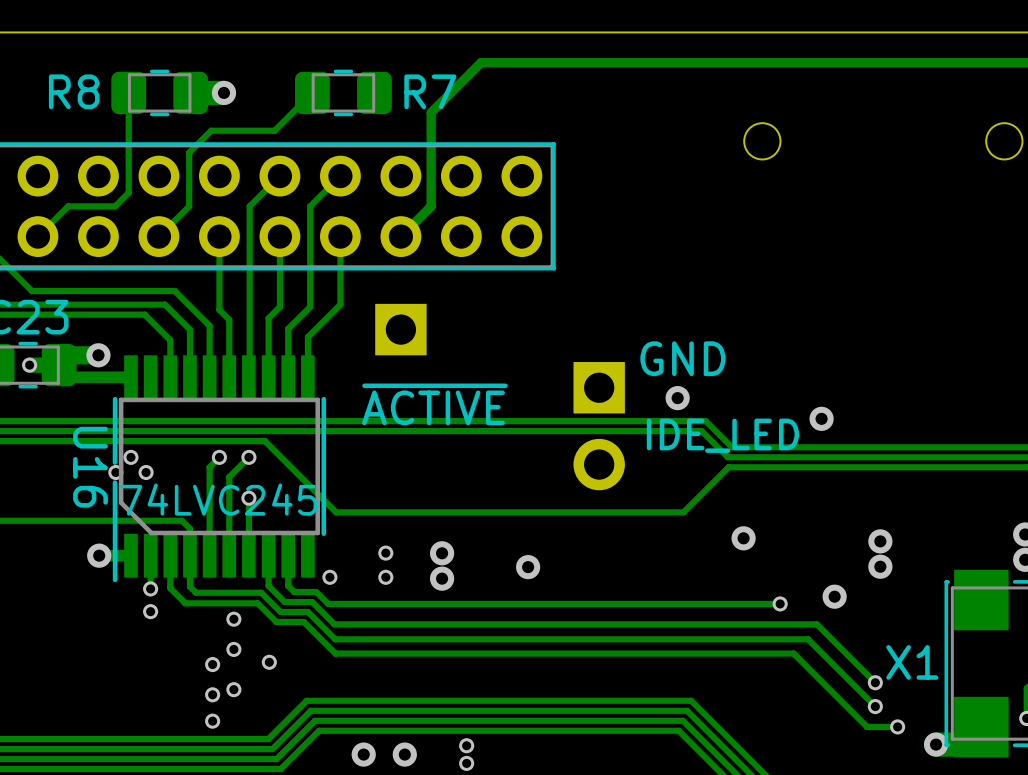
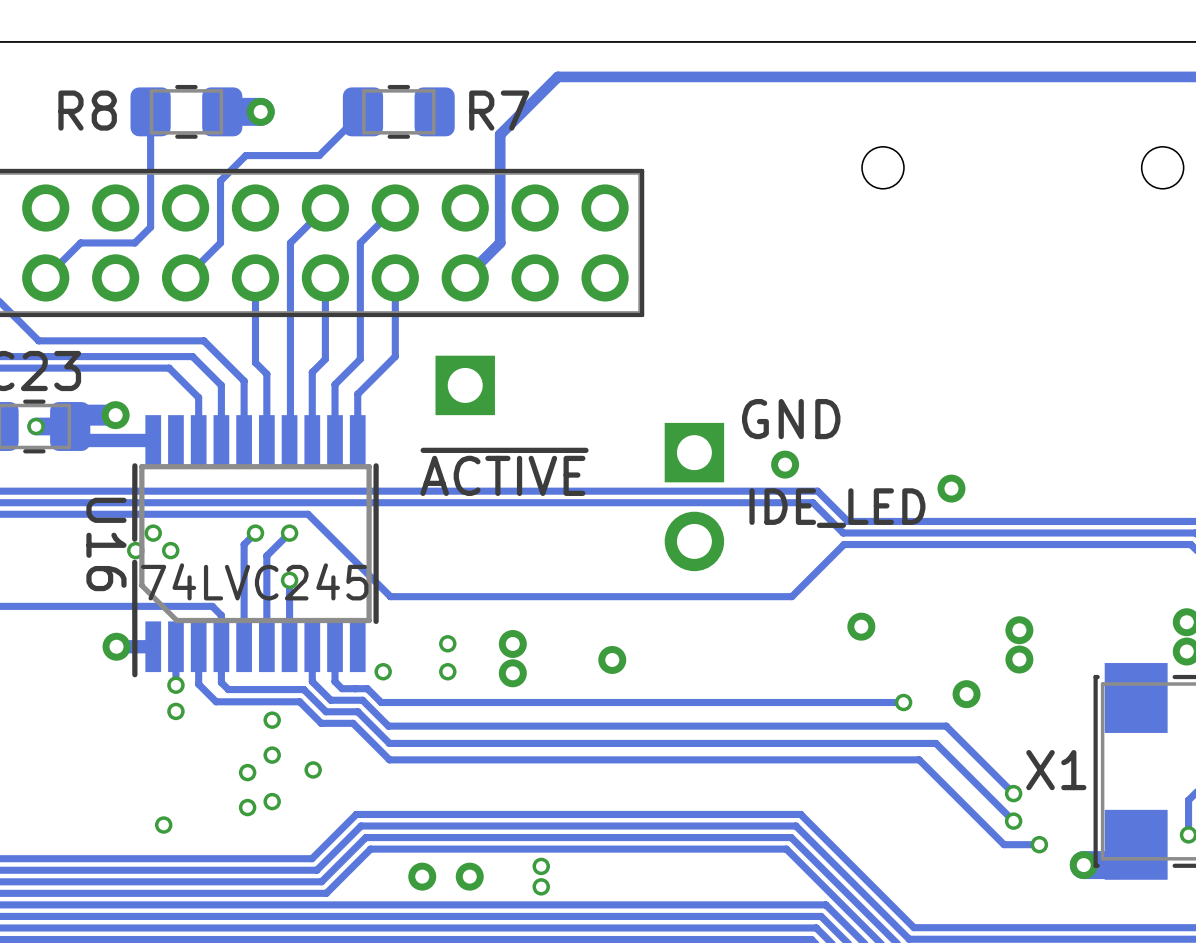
via position: (212, 721) -> (163, 825)

